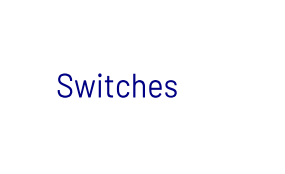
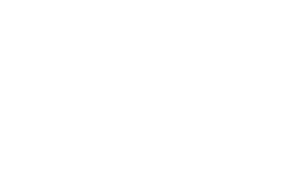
text: Switches (117, 85) -> none

